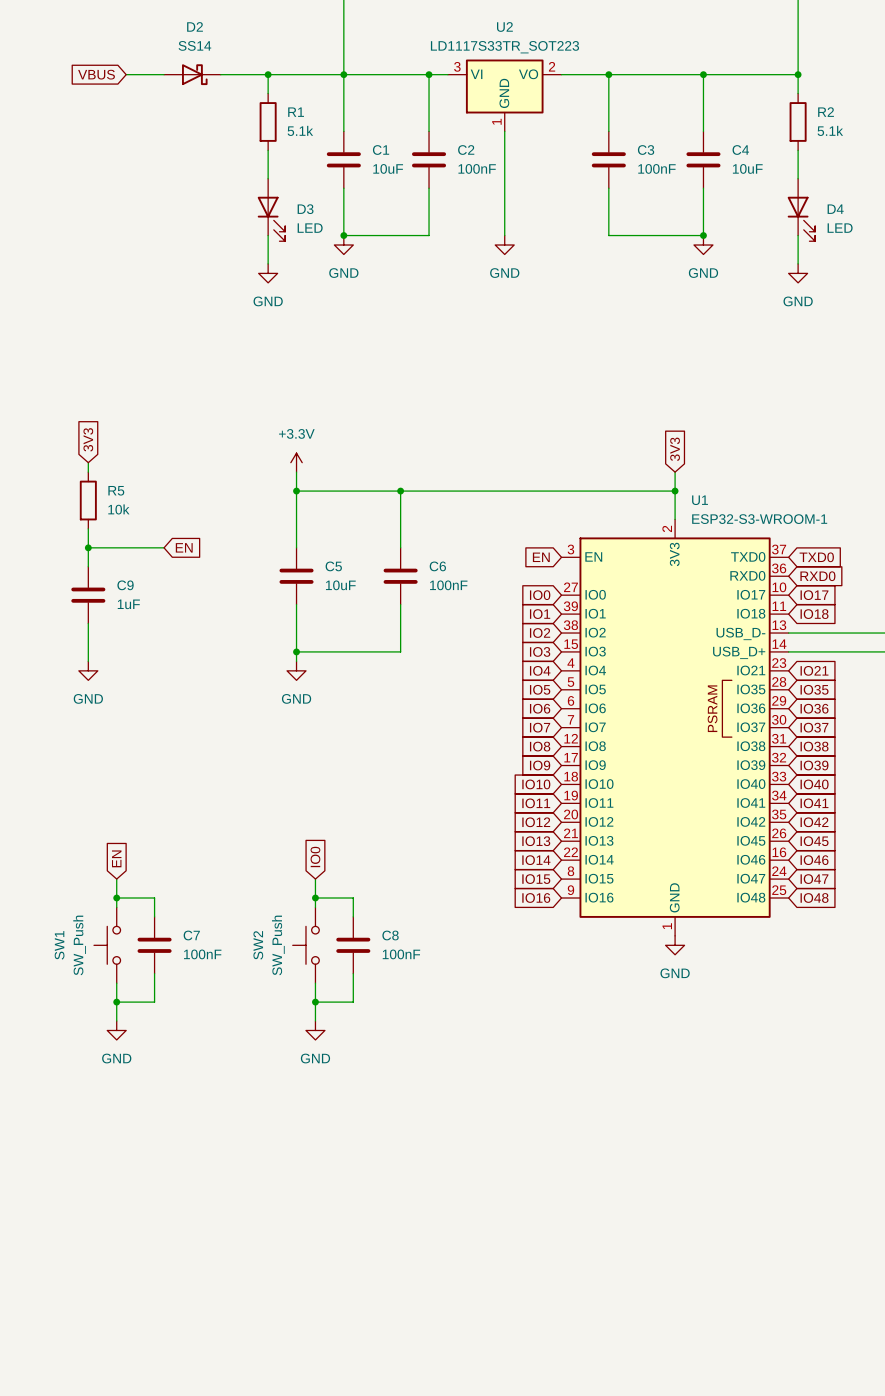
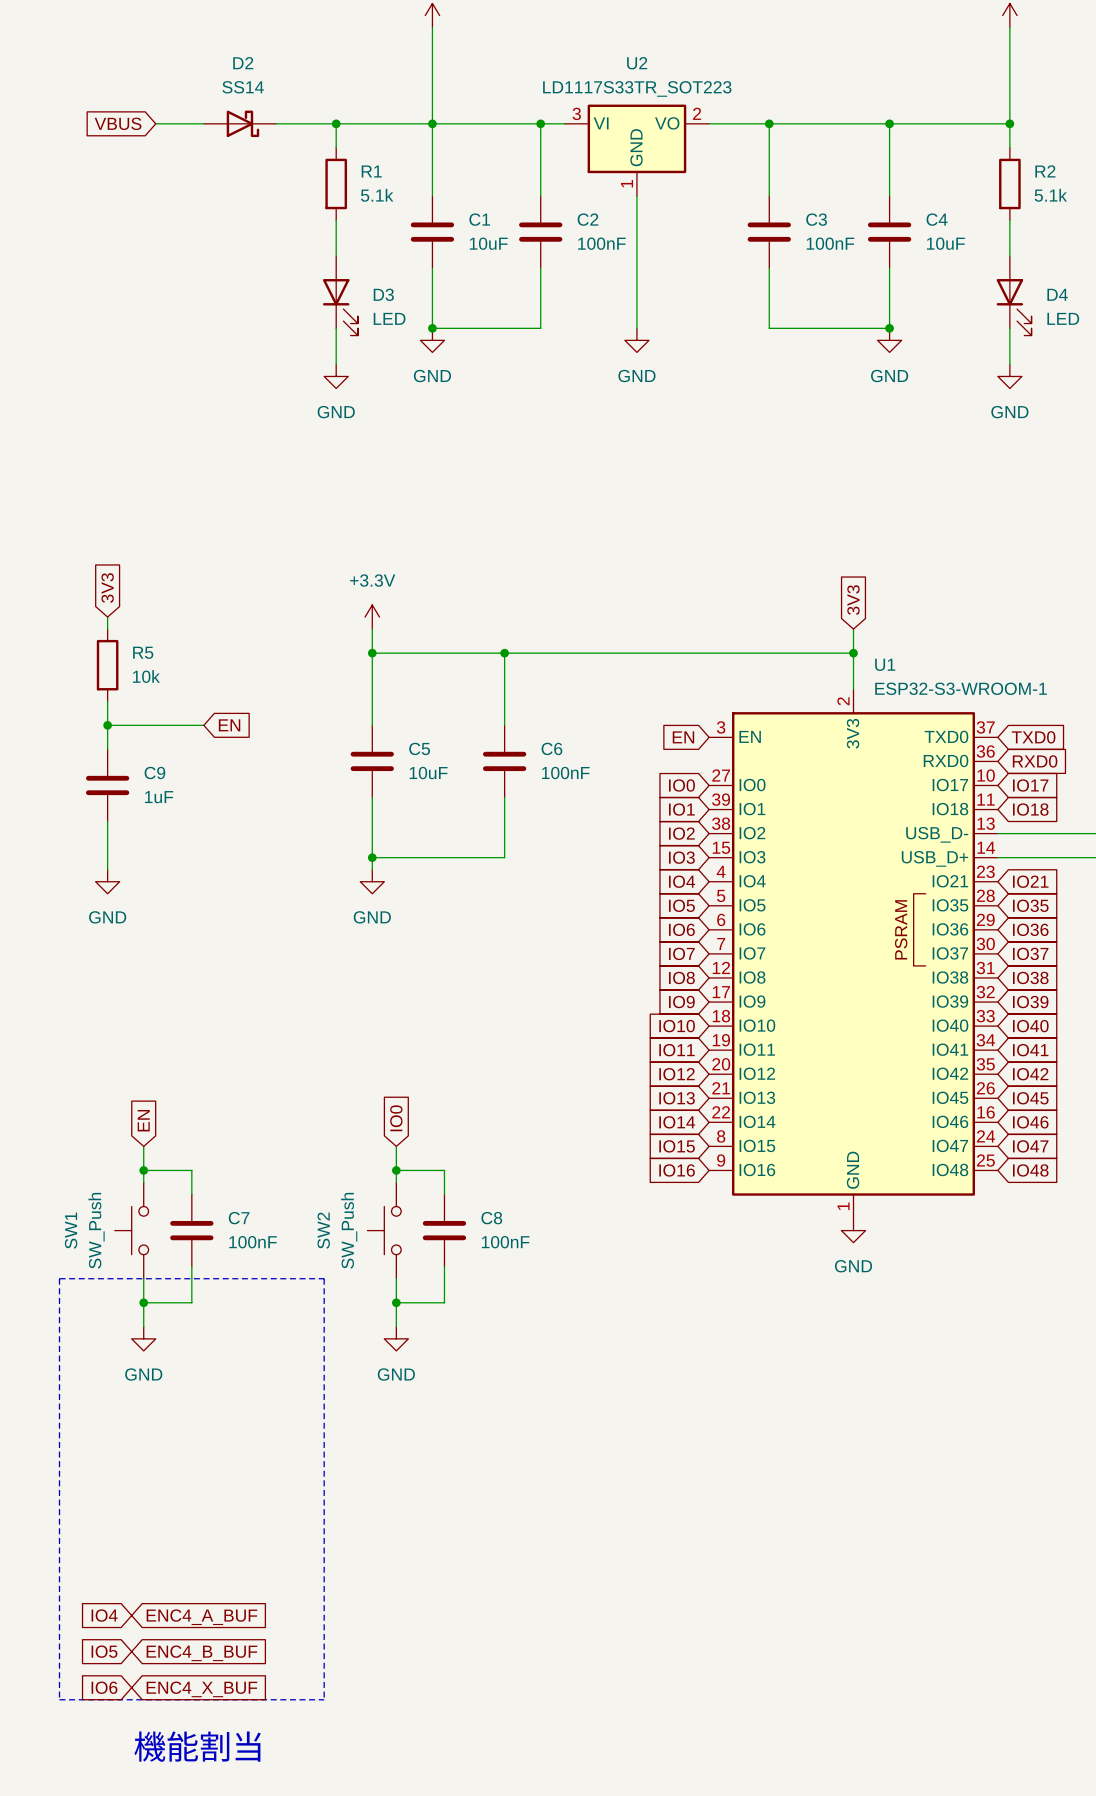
line: none -> (59, 1278) (59, 1699) (324, 1699) (324, 1278) (59, 1278)
global label: none -> IO4 (104, 1615)
global label: none -> ENC4_A_BUF (201, 1617)
global label: none -> IO5 (104, 1651)
global label: none -> ENC4_B_BUF (201, 1653)
global label: none -> IO6 (104, 1687)
global label: none -> ENC4_X_BUF (201, 1689)
text: none -> 機能割当 (197, 1746)

